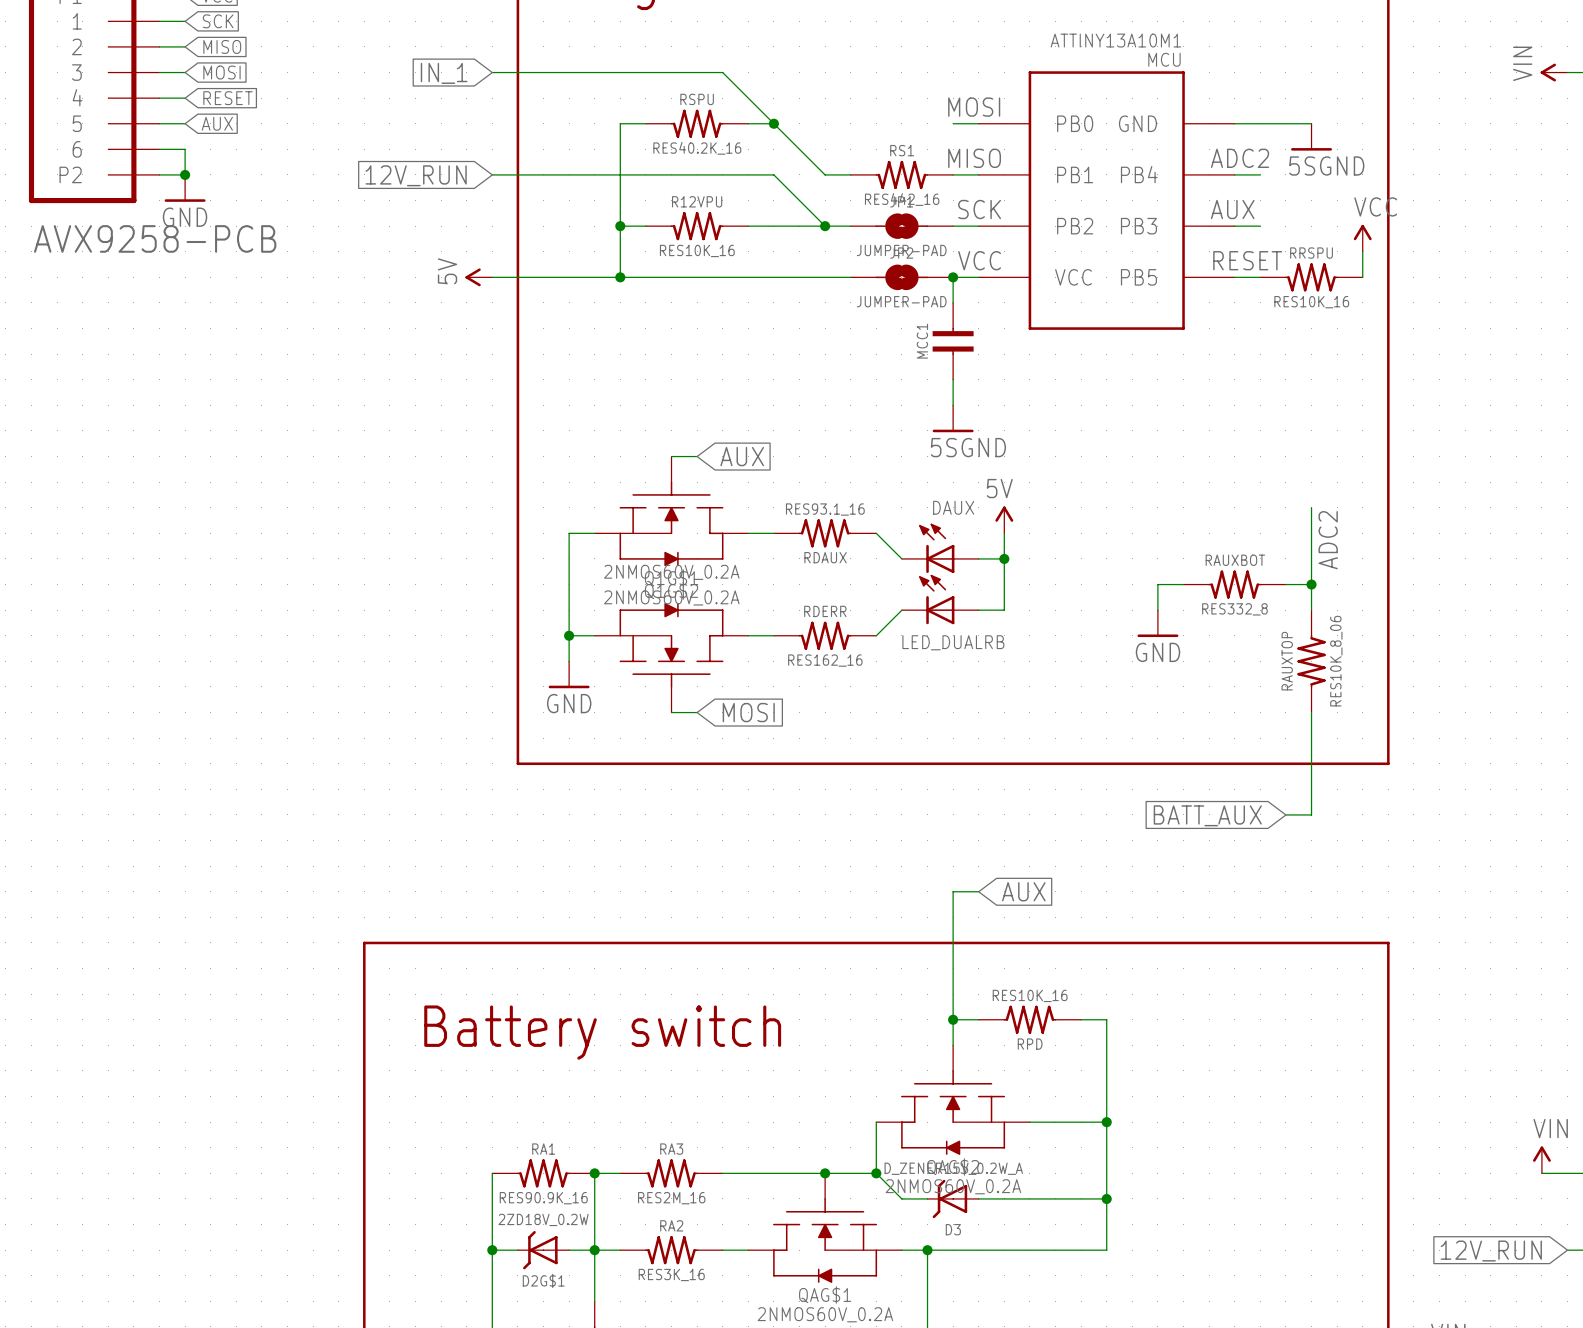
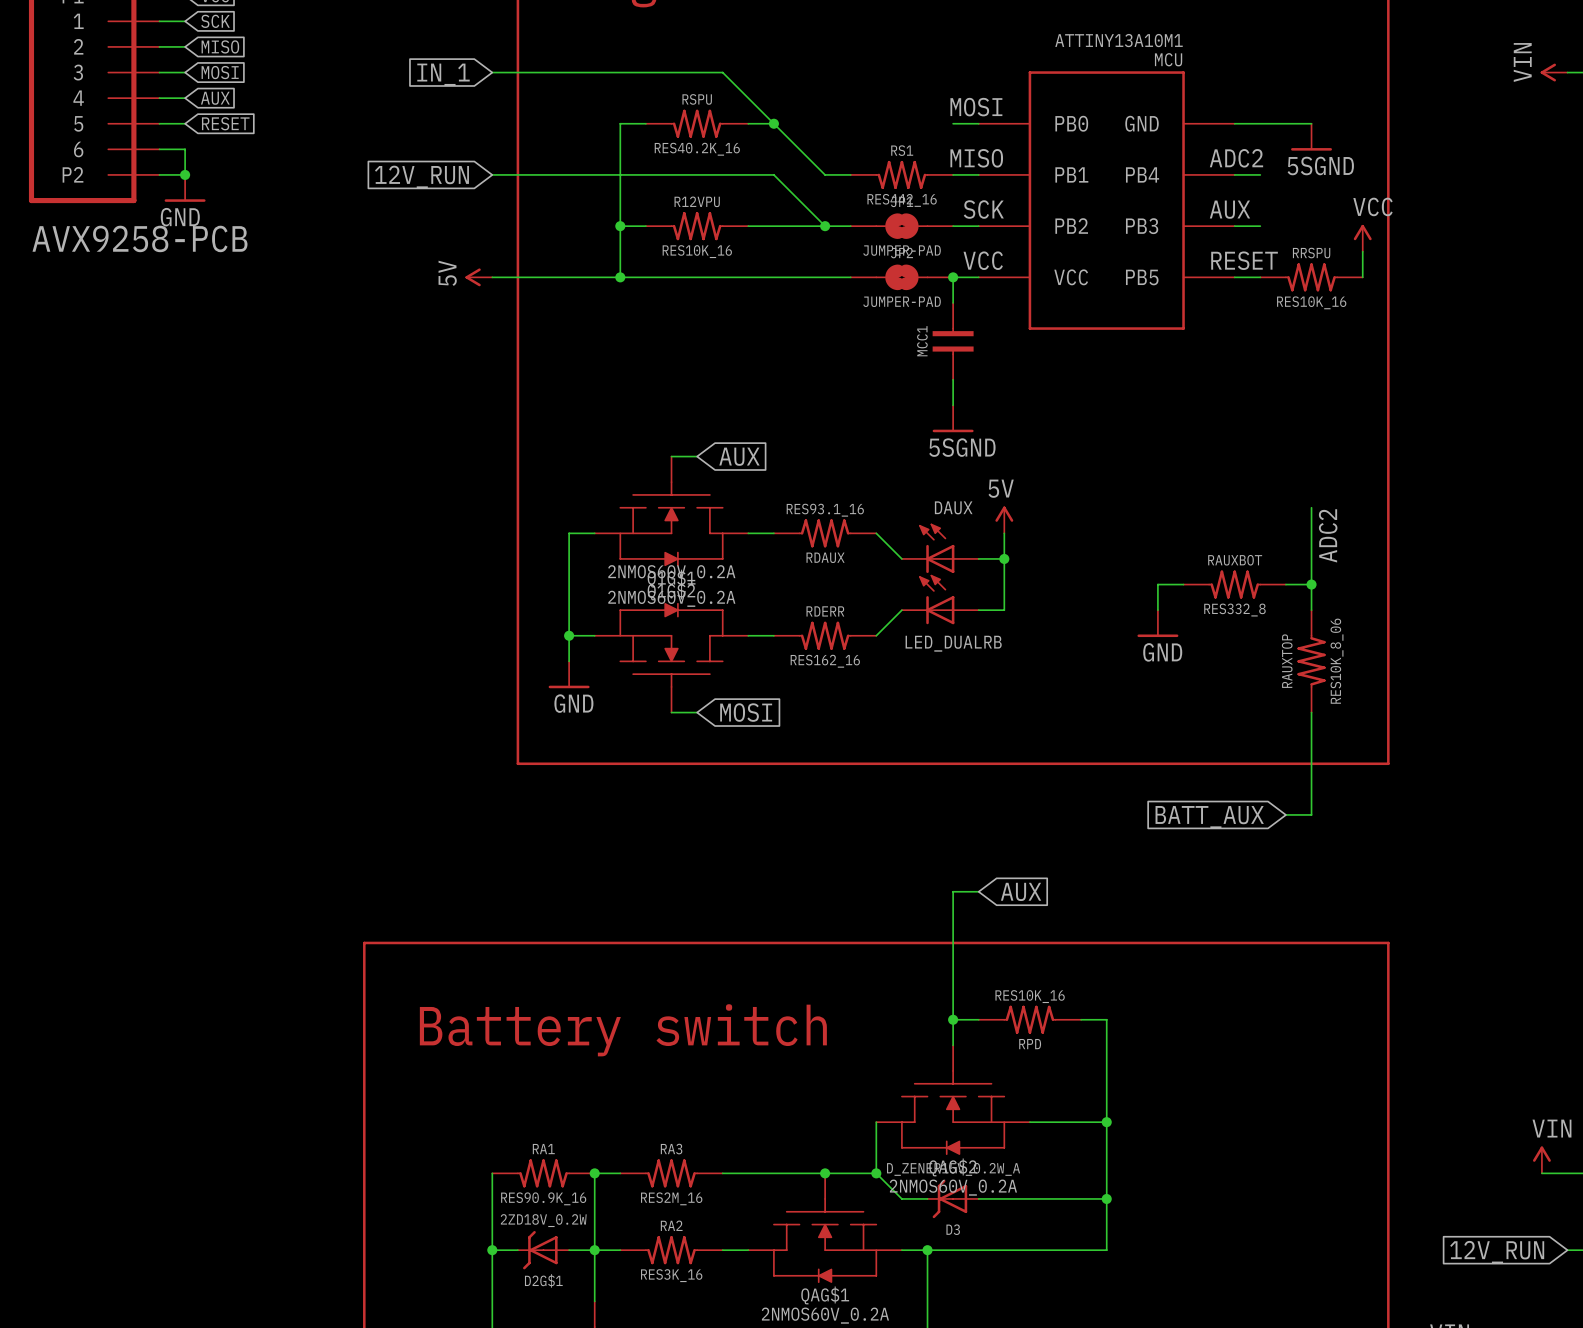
global label: RESET (228, 98) -> AUX (215, 98)
global label: AUX (217, 123) -> RESET (225, 123)

